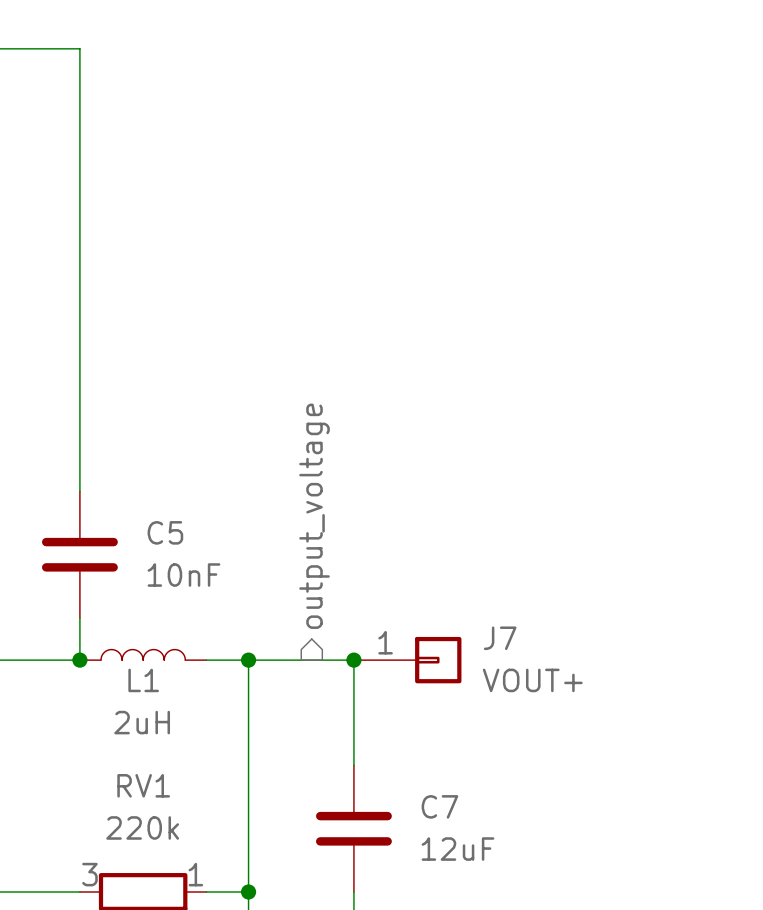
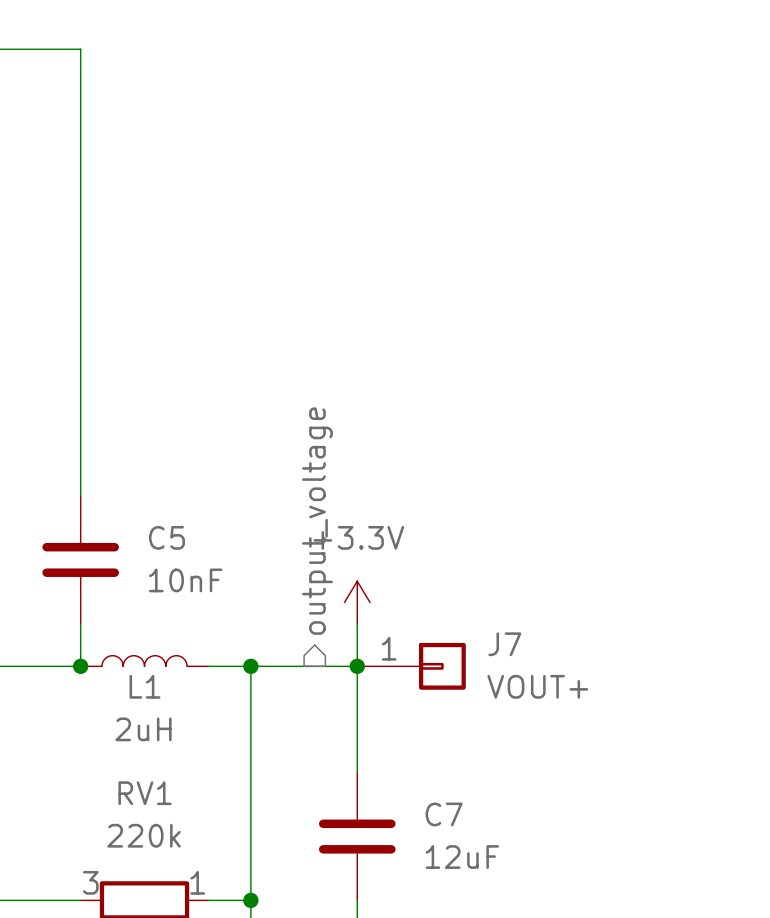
power symbol: none -> +3.3V (357, 602)
wire: none -> (357, 623) (357, 666)

